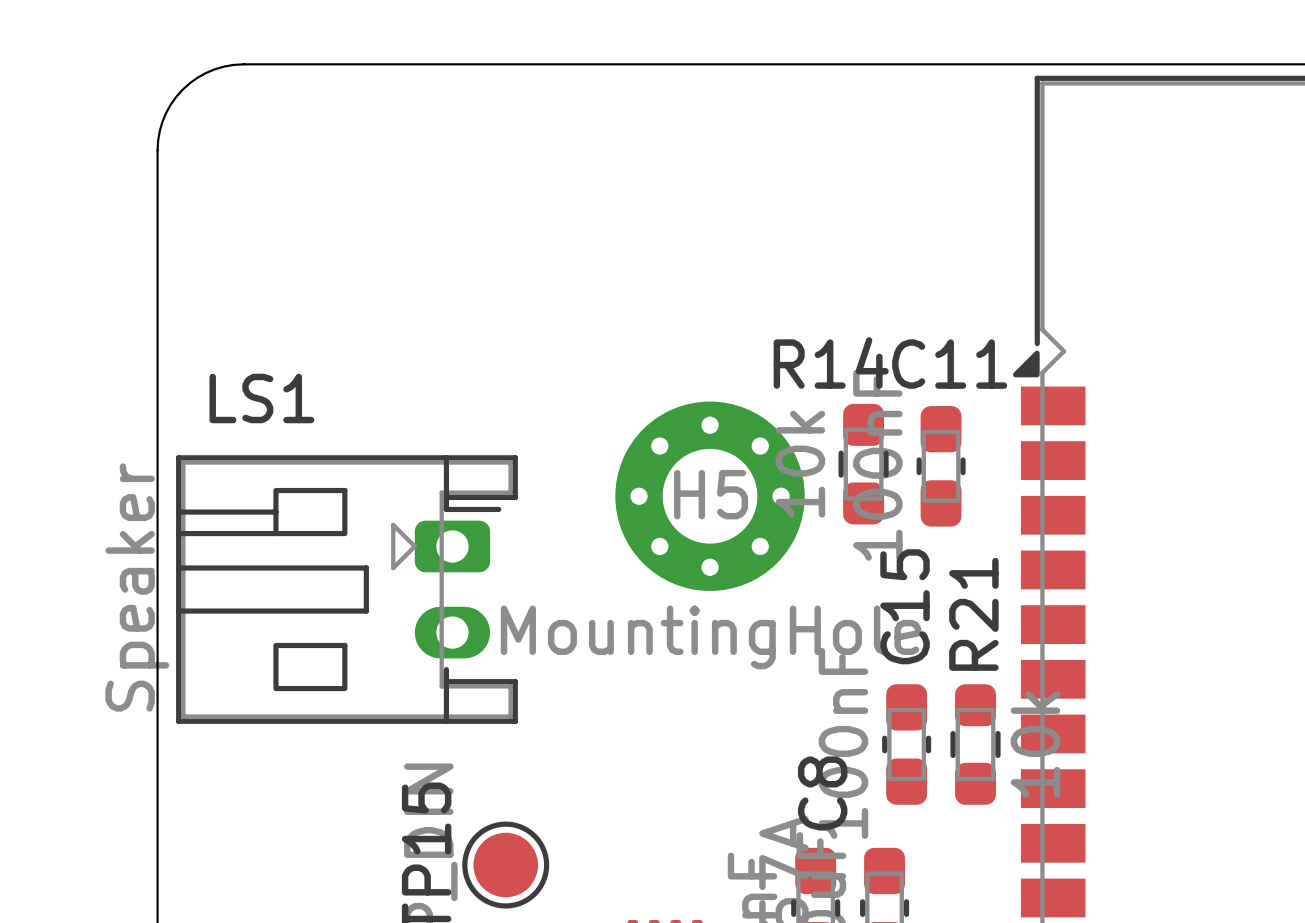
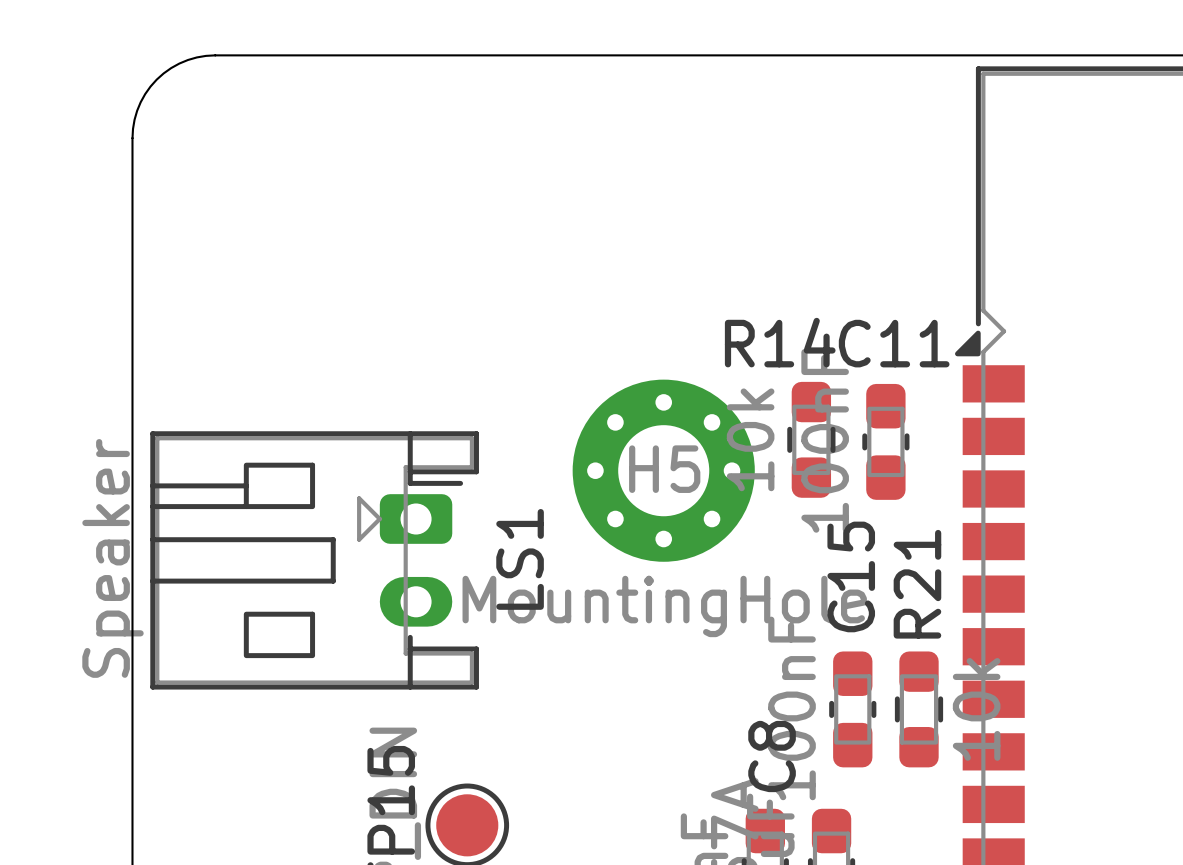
LS1 name rotation: 0° (261, 398) -> 90° counterclockwise (520, 559)
LS1 name position: LS1 (261, 398) -> LS1 (520, 559)

